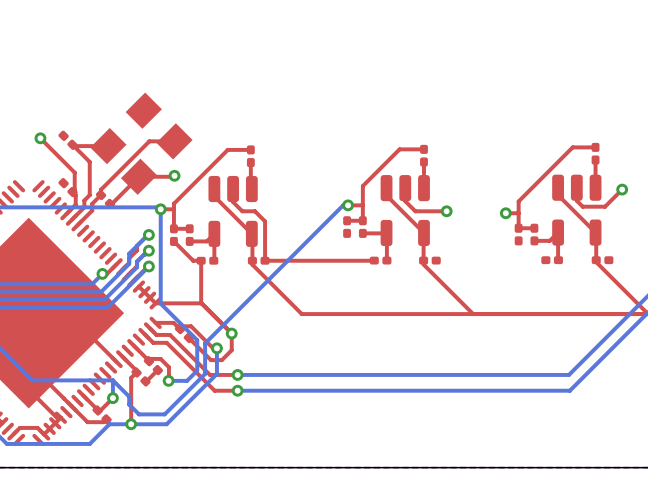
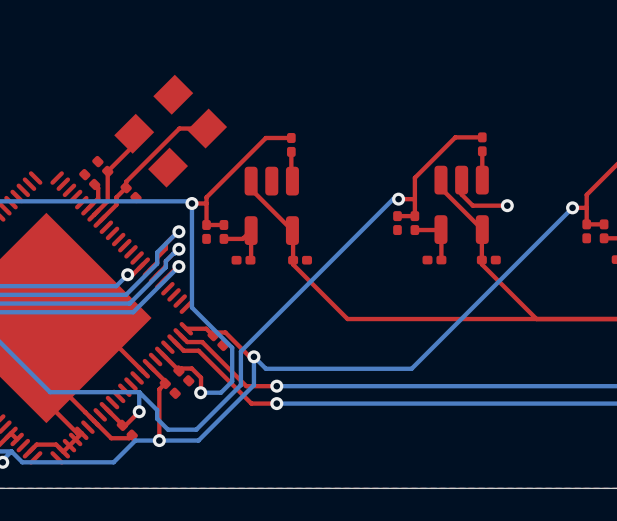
top track: (40, 138) (74, 172) (74, 189) (72, 192) -> none
via: (40, 138) -> none
part position: (68, 140) -> (102, 166)
top track: (72, 144) (89, 161) (89, 195) (84, 200) -> (134, 133) (134, 144) (107, 171) (107, 193)
top track: (108, 146) (73, 146) -> none
top track: (174, 175) (139, 176) (109, 203) -> none
via: (174, 175) -> none
top track: (233, 189) (233, 202) (242, 211) (254, 211) (265, 221) (265, 260) (374, 260) -> none
bottom track: none -> (572, 207) (411, 368) (265, 368) (253, 356)
top track: (173, 241) (193, 260) (201, 260) (201, 302) (231, 333) (231, 350) (221, 360) (211, 360) (188, 338) -> none
top track: (138, 286) (155, 303) (201, 303) -> none
via: (231, 333) -> none
top track: (157, 370) (145, 381) -> none

